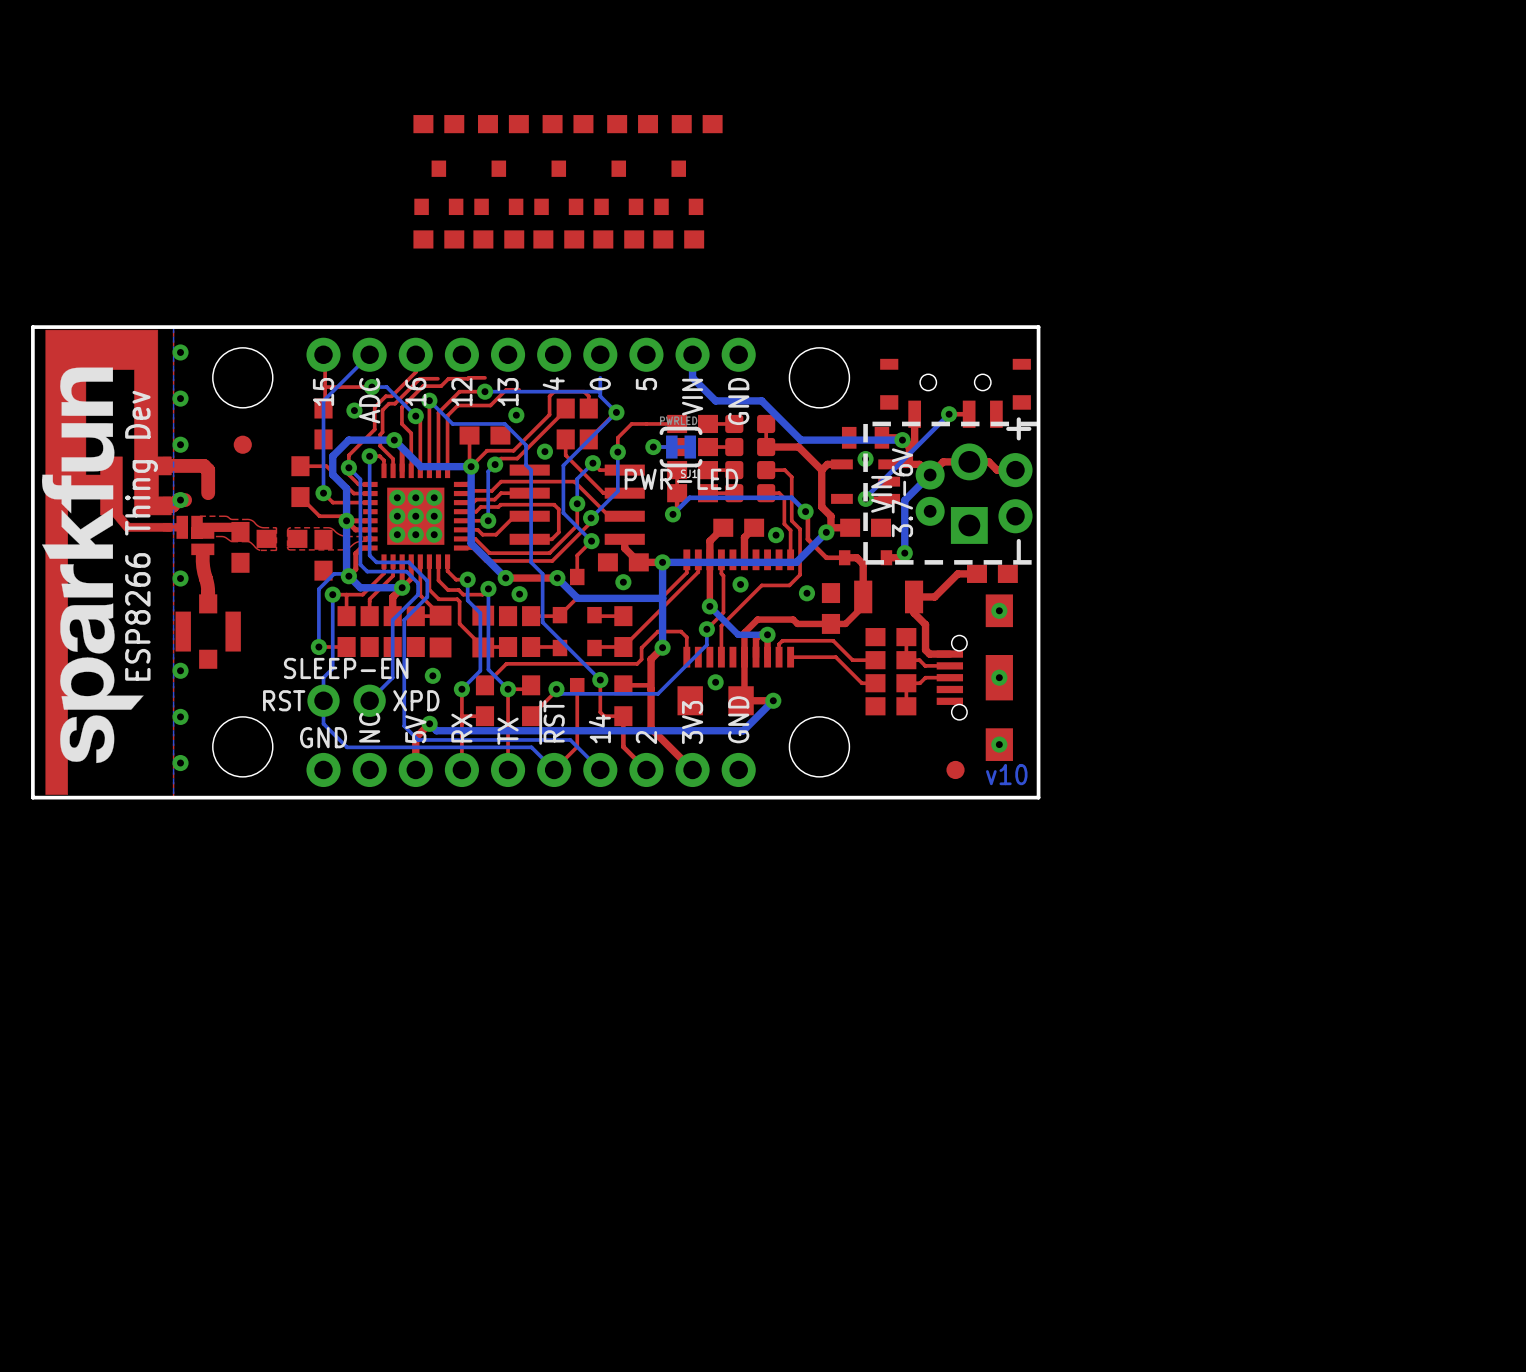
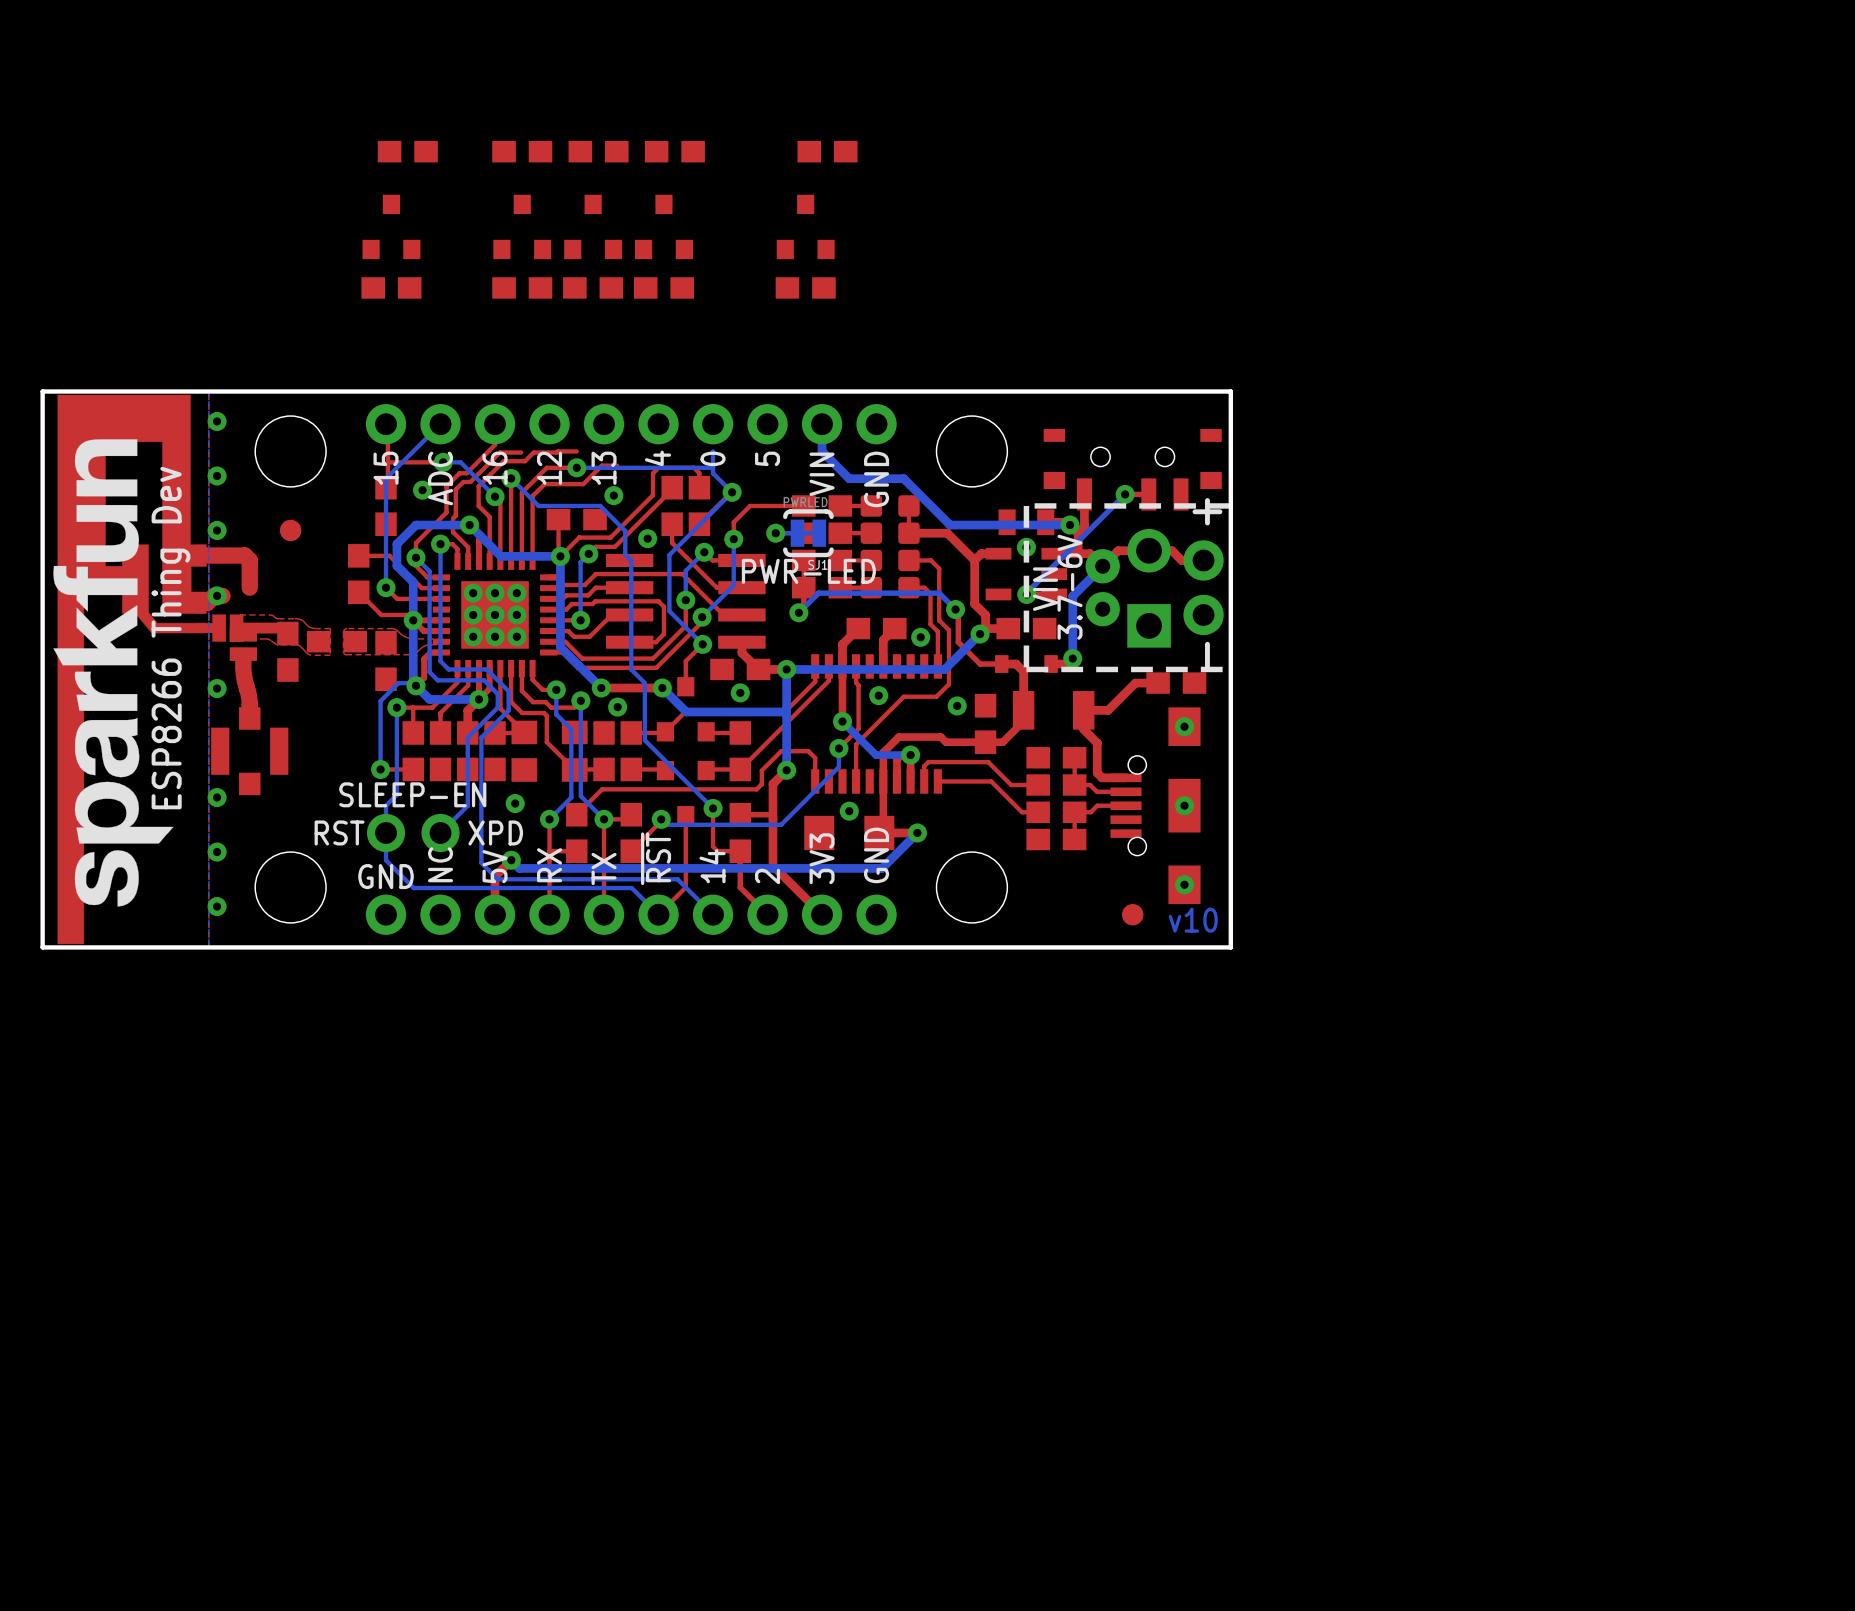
part: none -> (407, 151)
part: (632, 124) -> none
part position: (618, 187) -> (391, 226)
part: none -> (391, 287)
part: (618, 239) -> none

